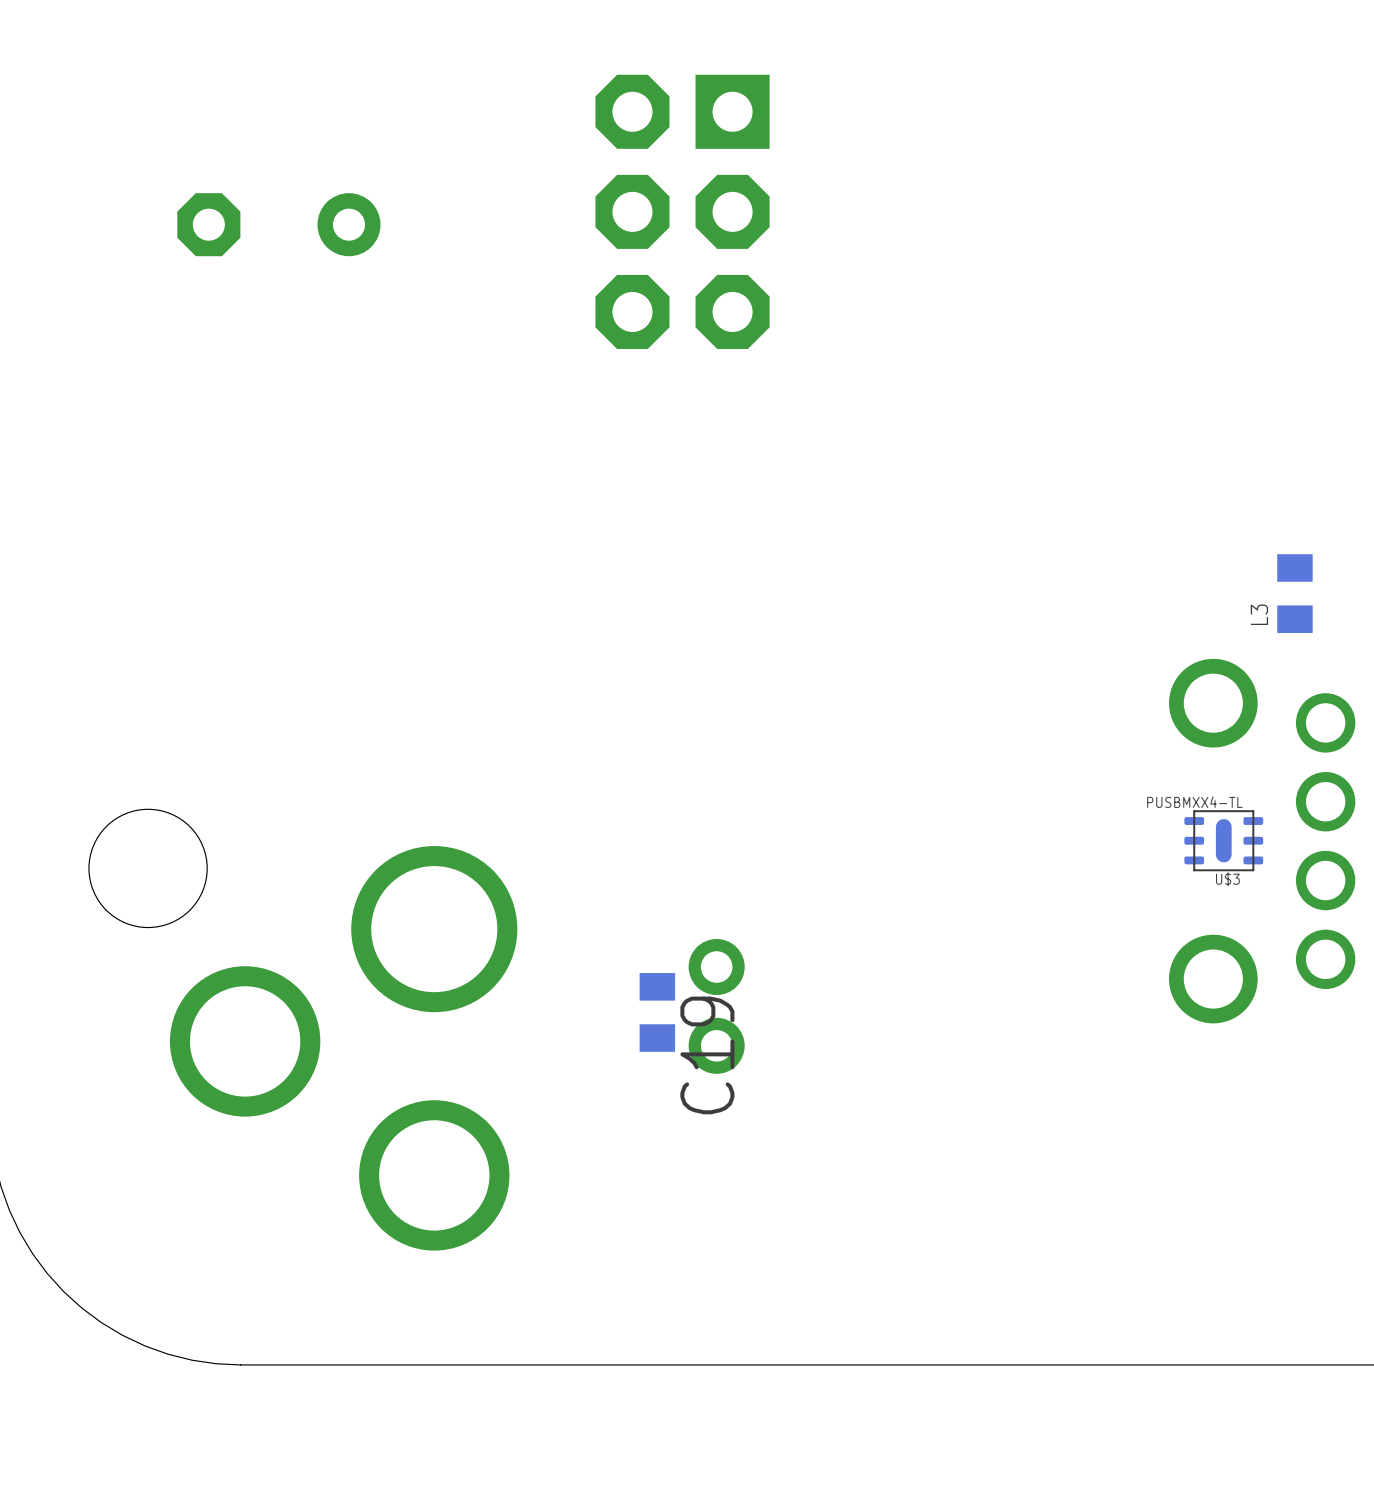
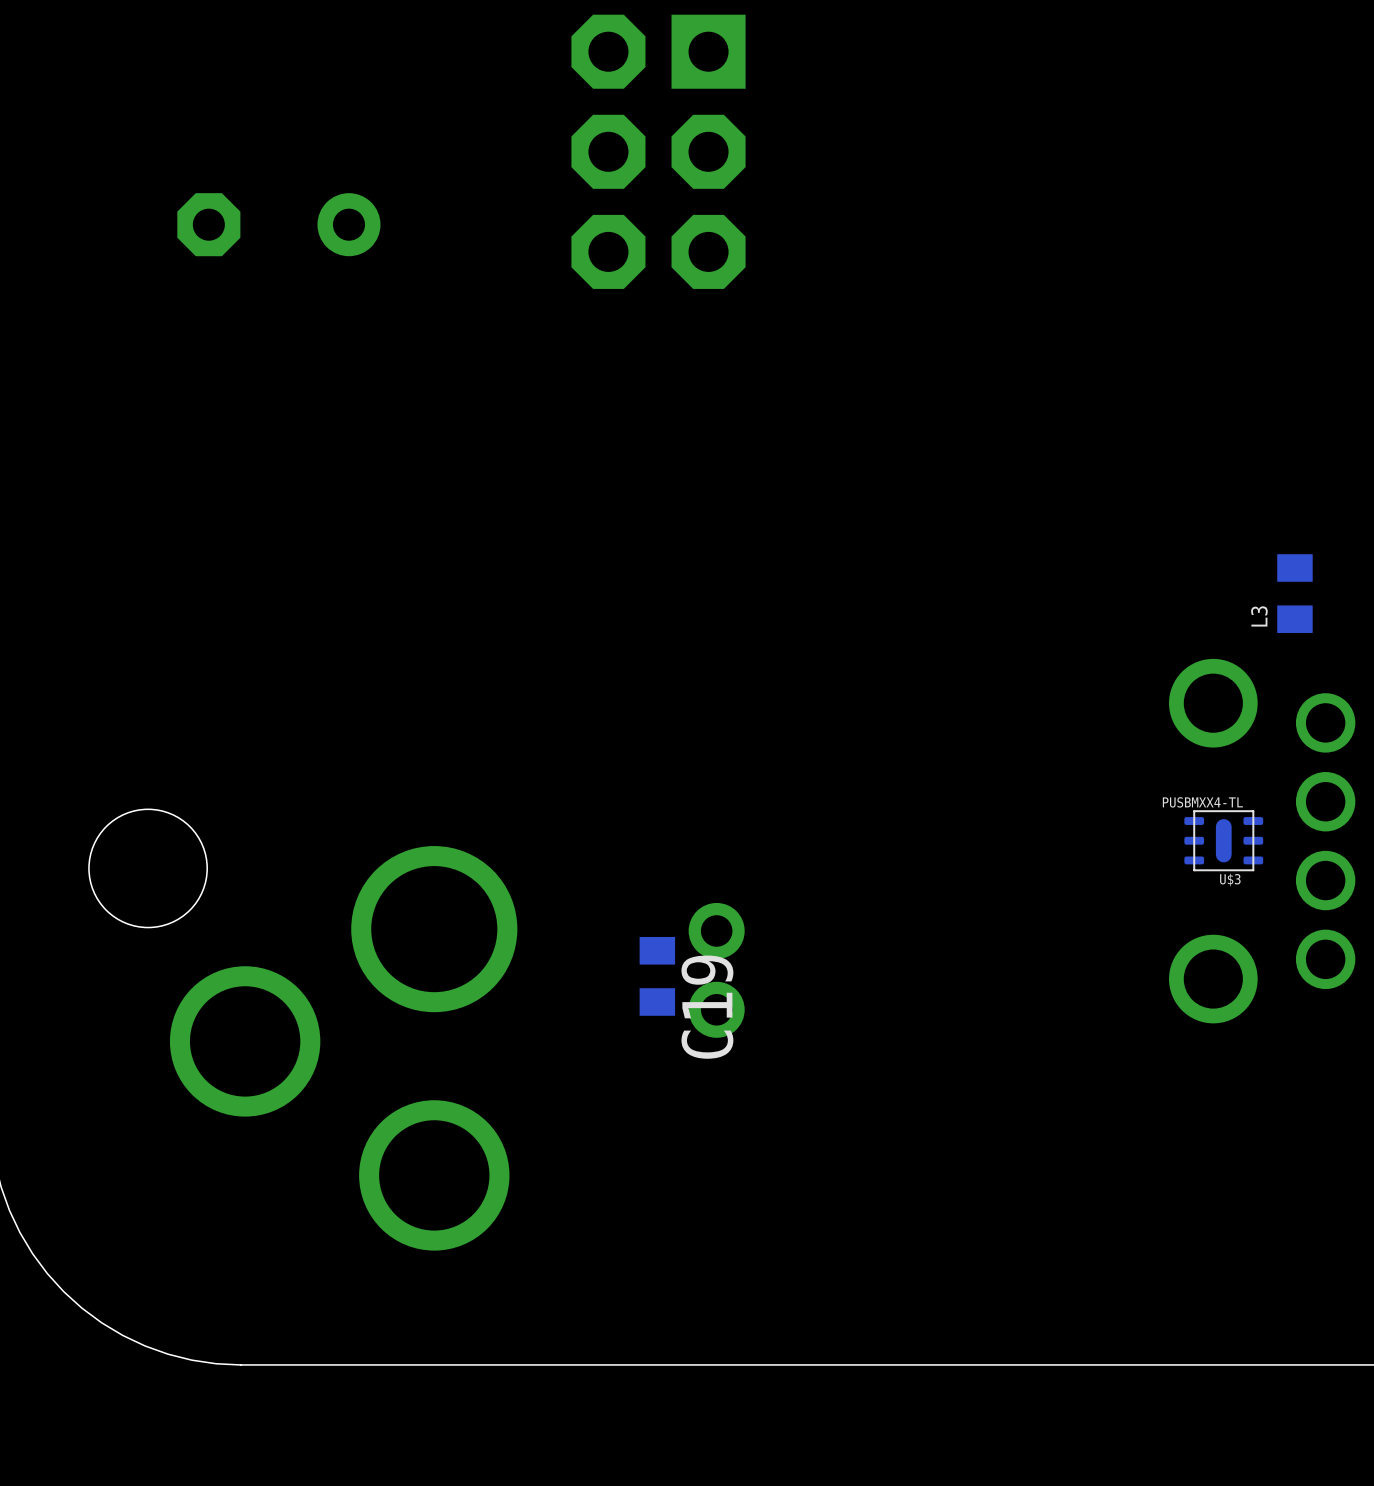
part position: (682, 211) -> (658, 151)
part position: (716, 1006) -> (716, 970)
C19 position: (657, 1012) -> (657, 976)

